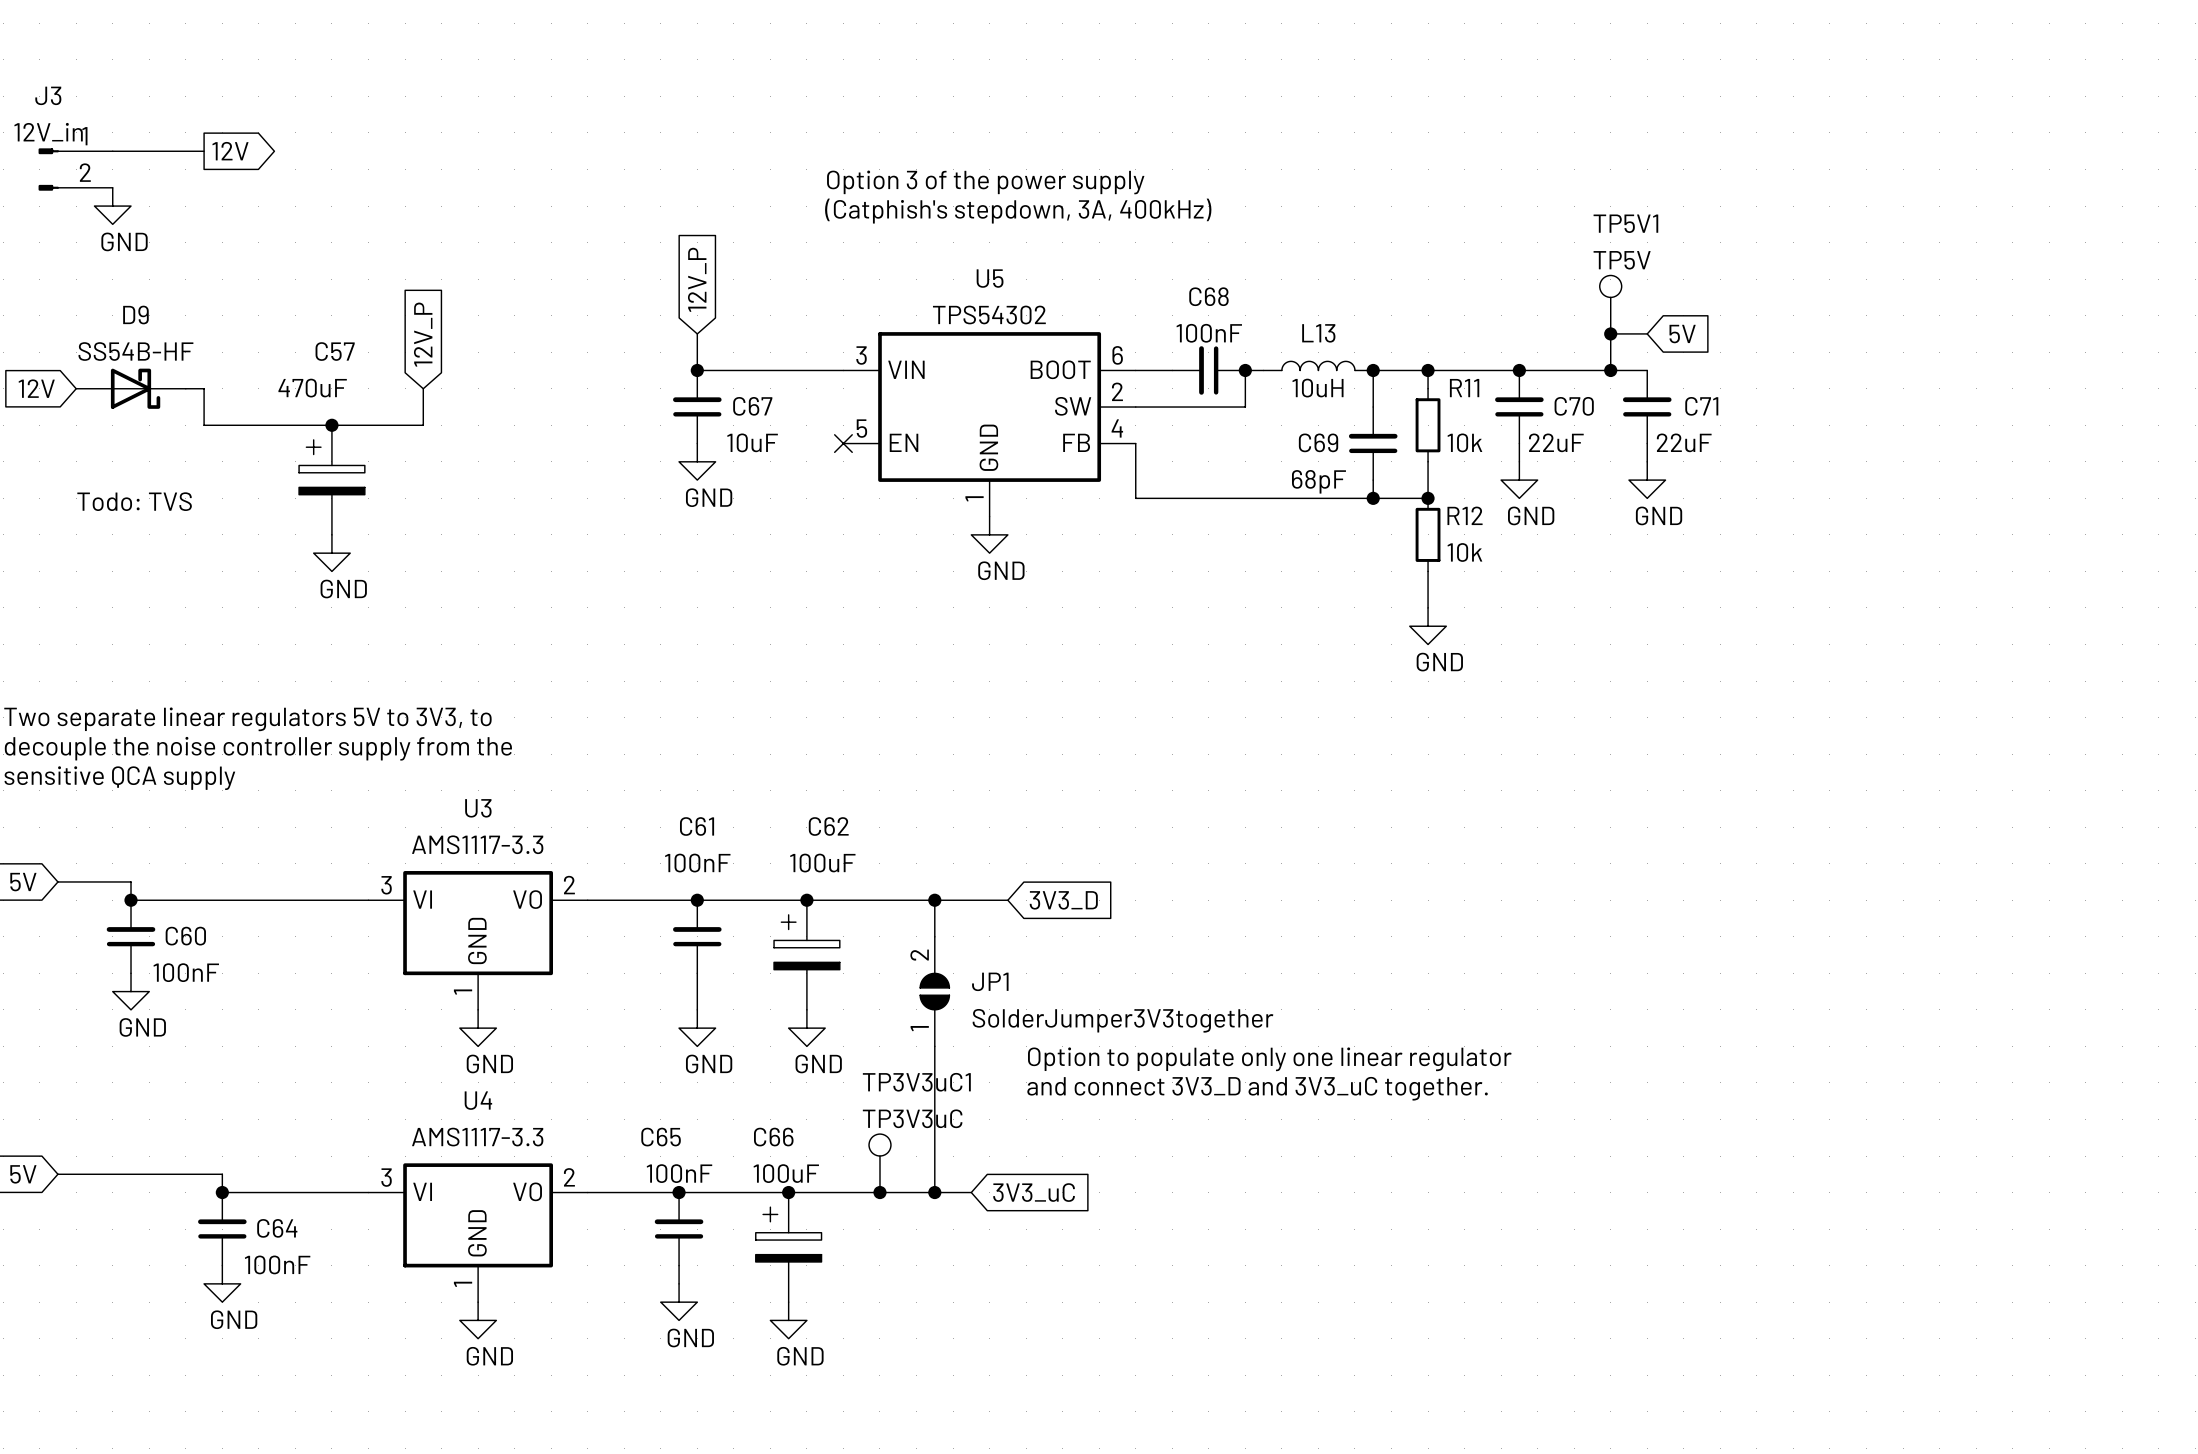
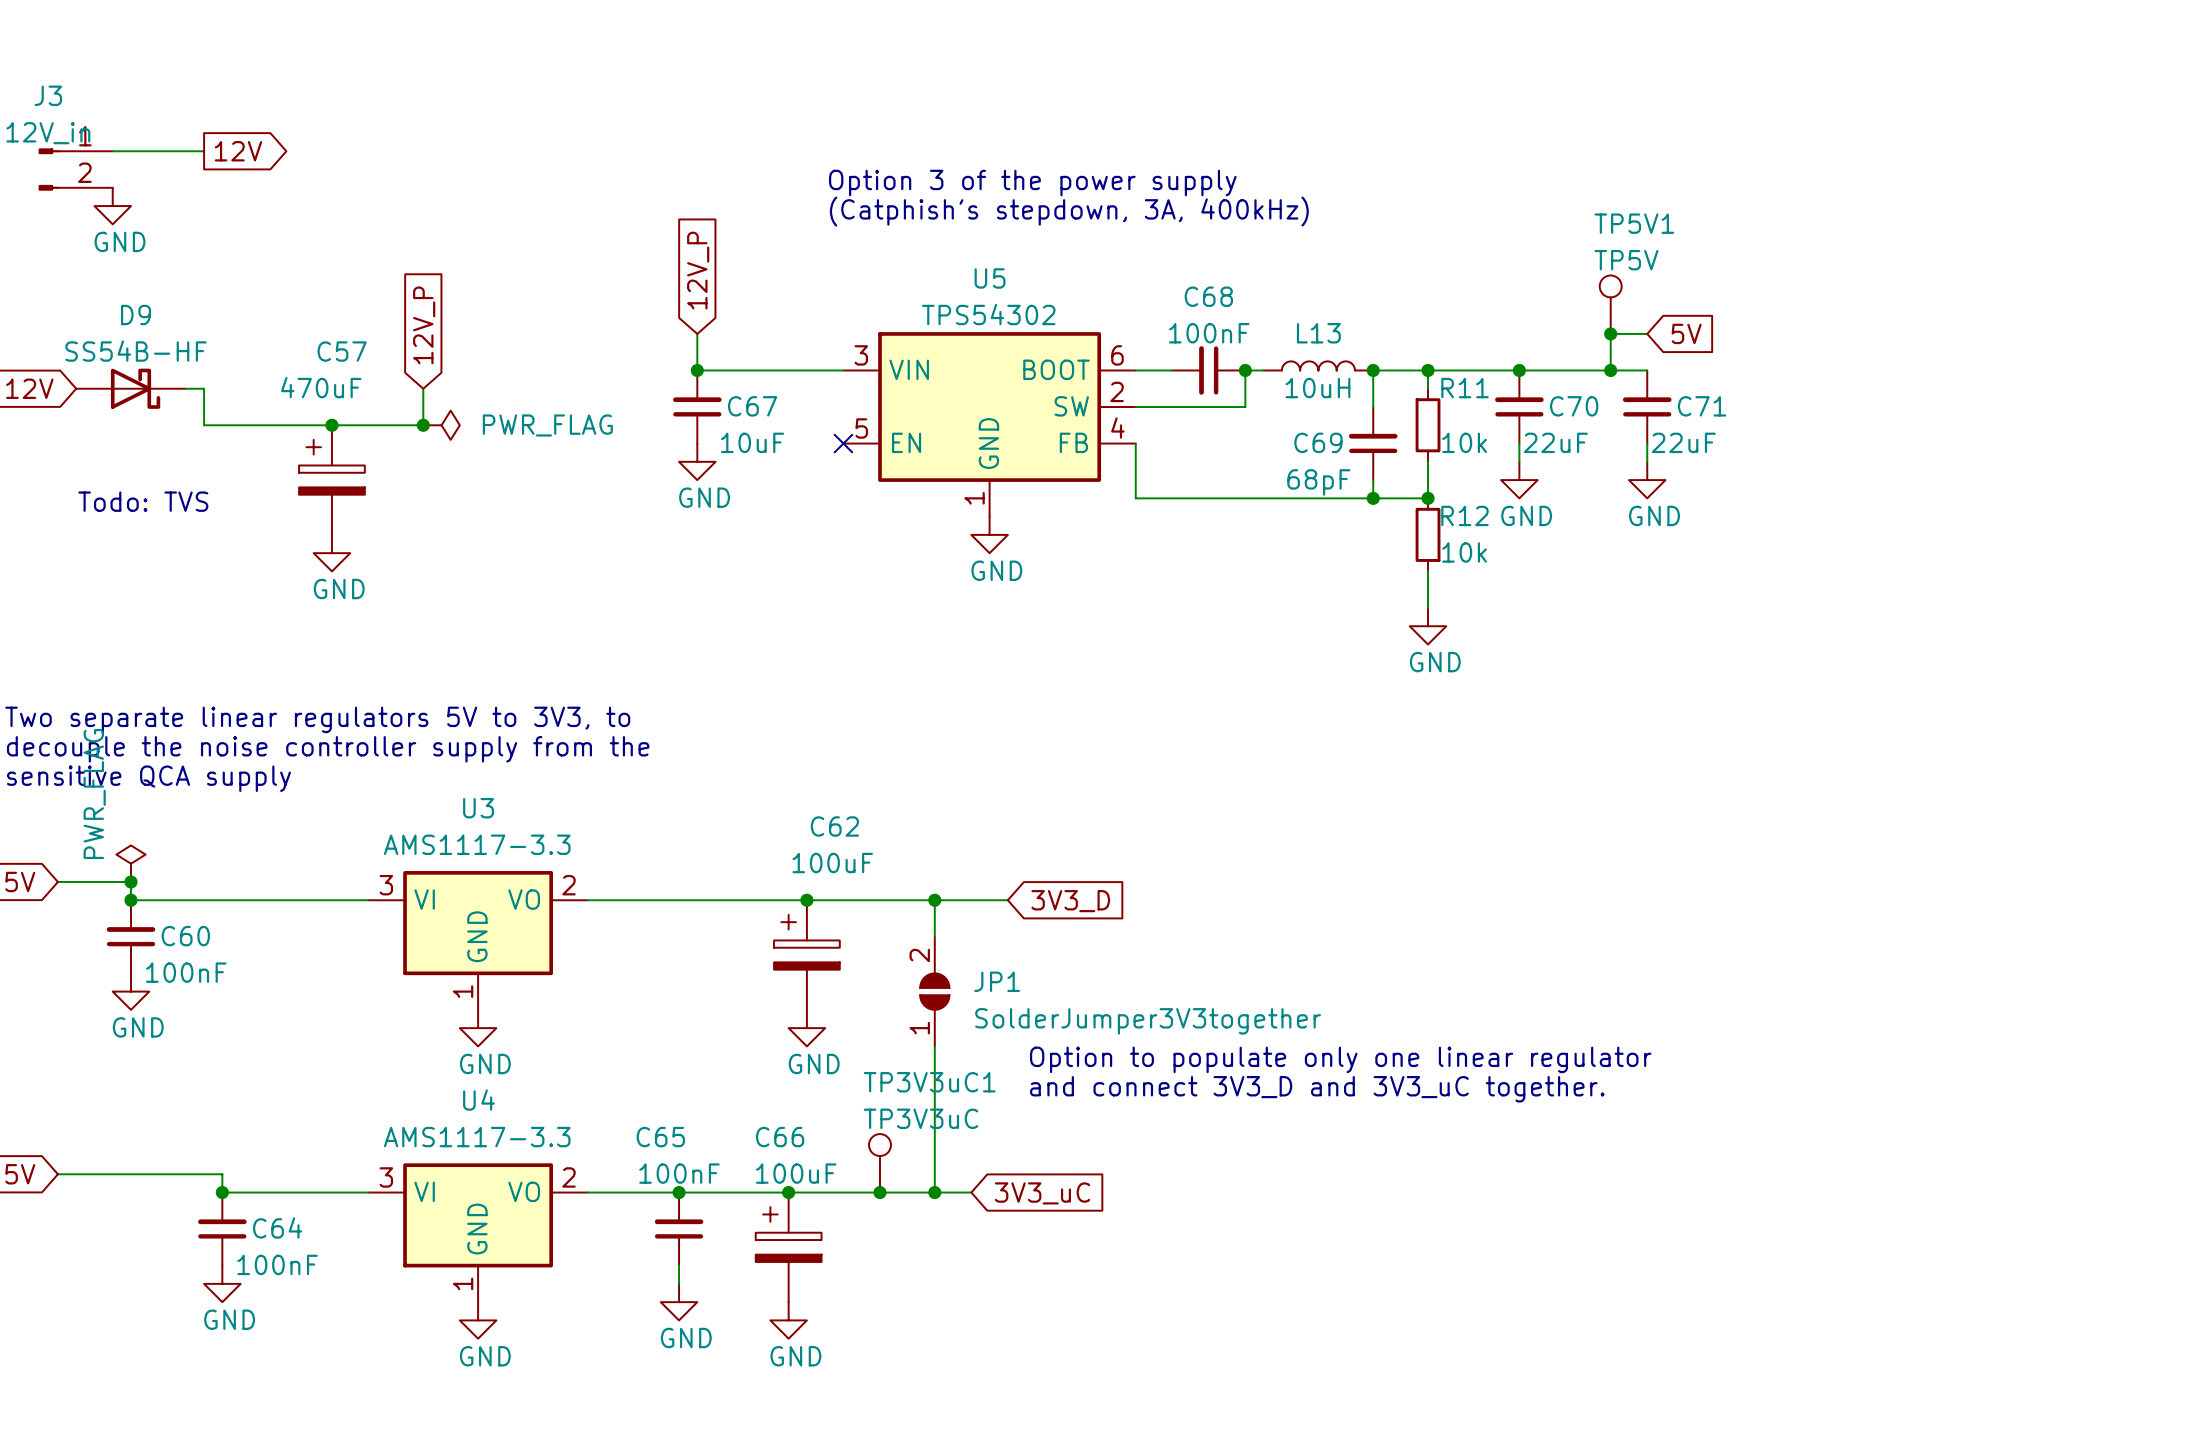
junction: none -> (423, 425)
power symbol: none -> PWR_FLAG (441, 425)
power symbol: none -> PWR_FLAG (131, 863)
junction: none -> (131, 881)
junction: (697, 900) -> none
C61: 100nF (697, 936) -> none
wire: (697, 973) (697, 1009) -> none
power symbol: GND (697, 1028) -> none

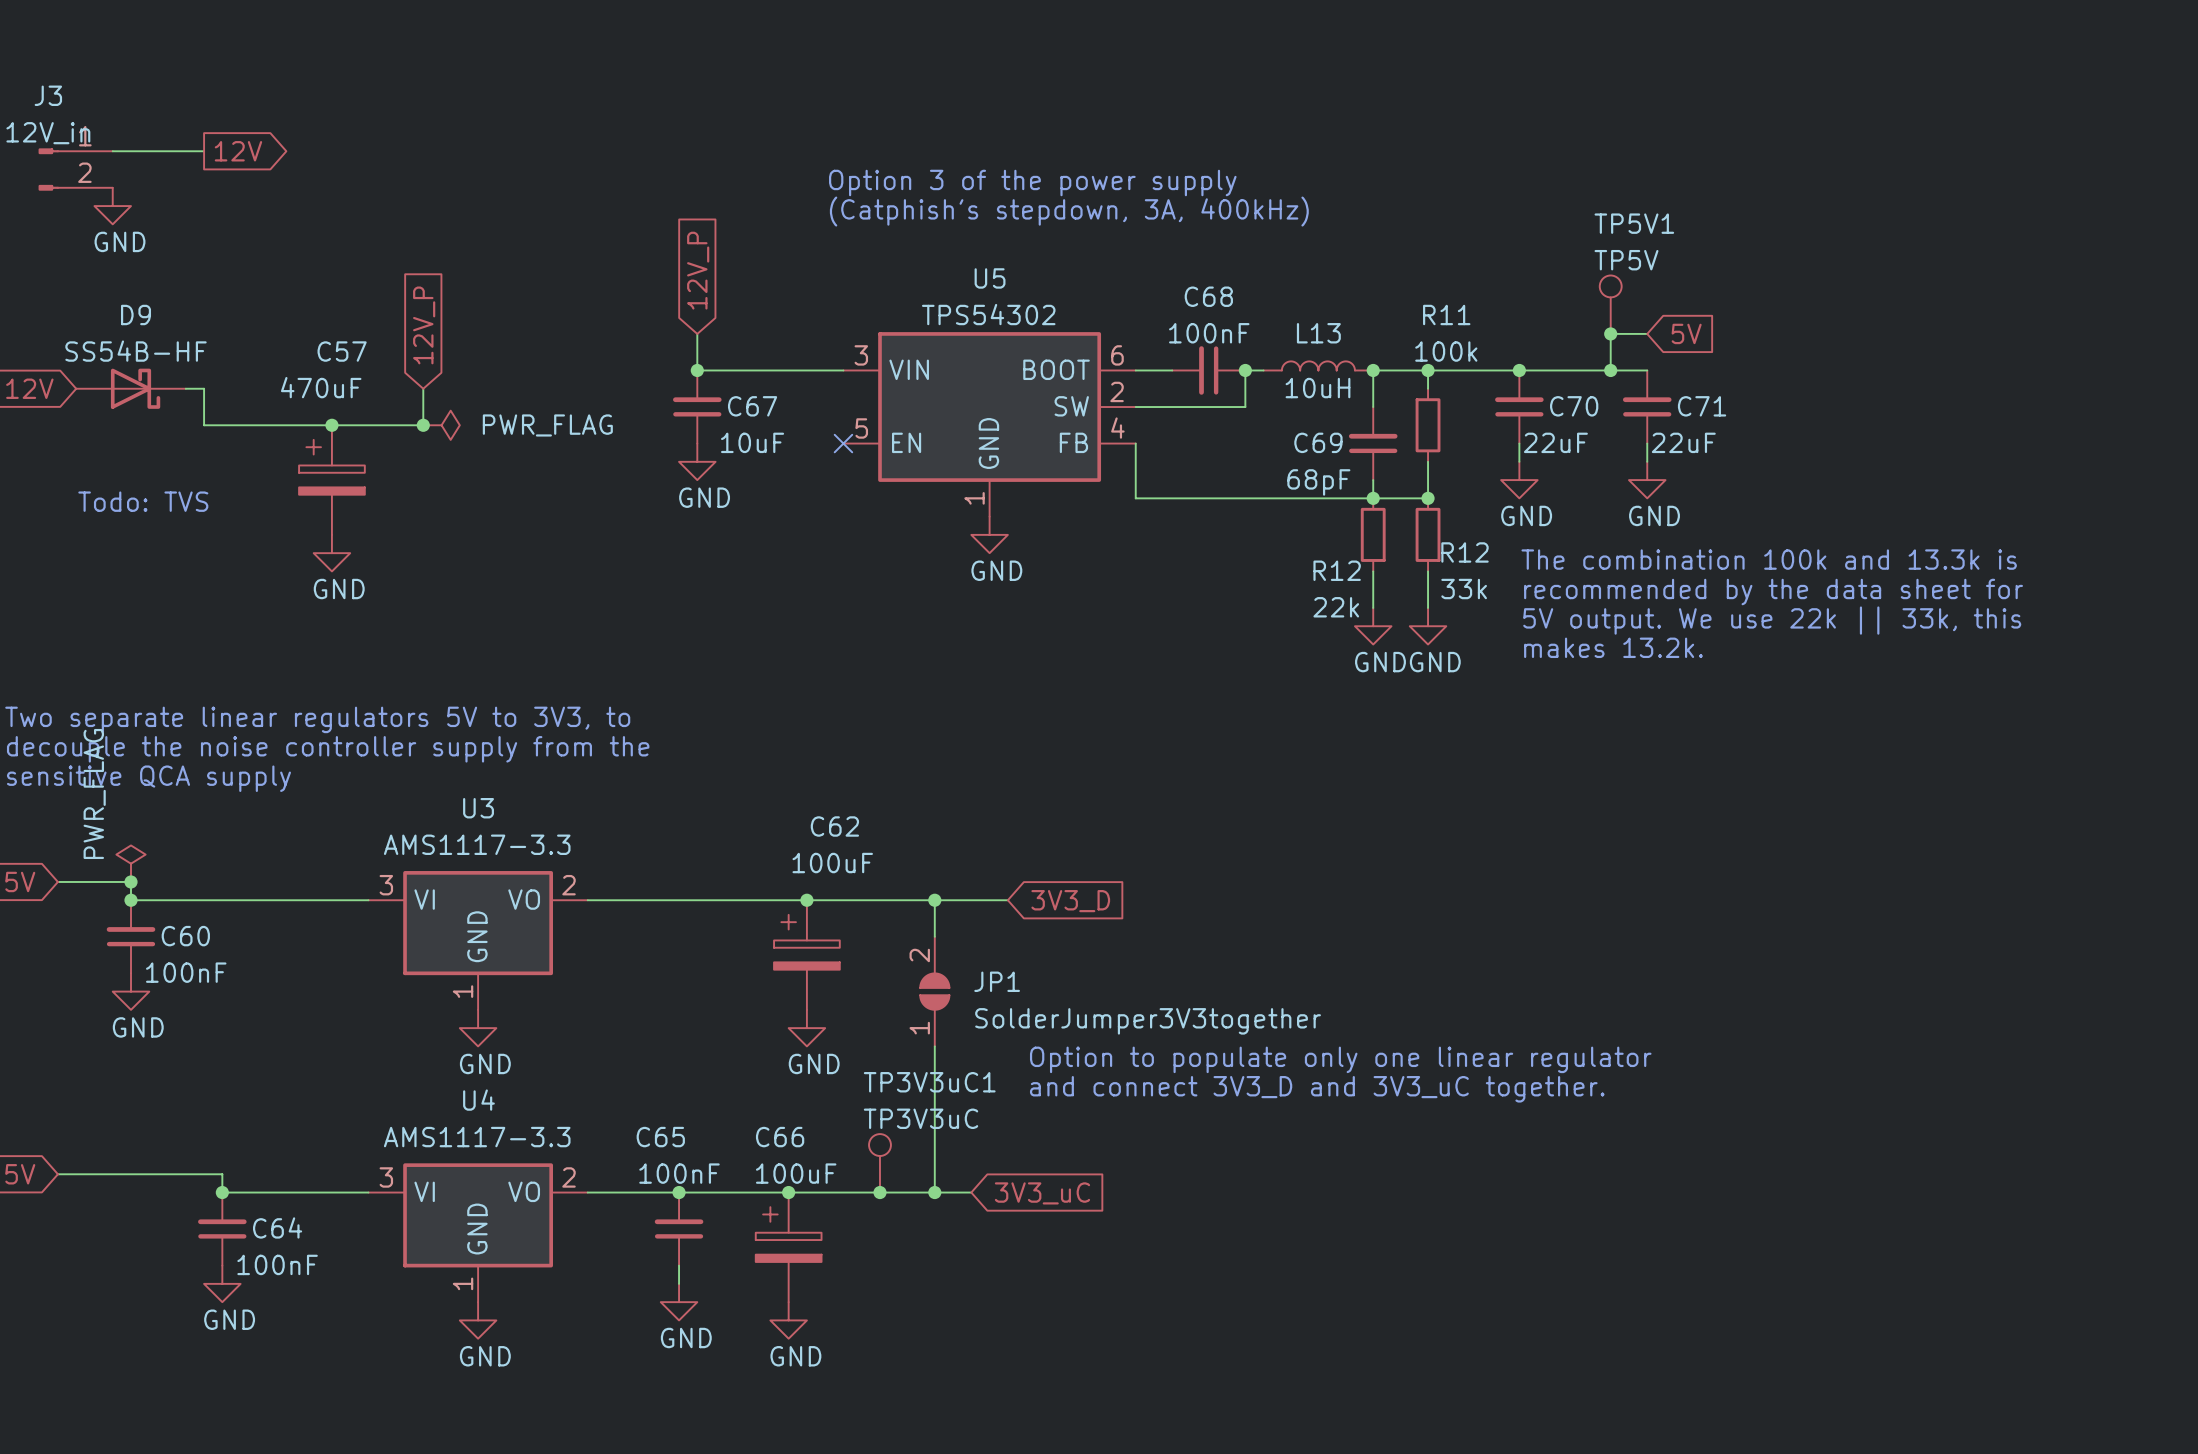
R11 name position: R11 (1465, 388) -> R11 (1446, 314)
R11 value: 10k (1464, 442) -> 100k (1446, 351)
R12 name position: R12 (1465, 515) -> R12 (1465, 552)
R12: none -> 22k (1373, 534)
R12 value: 10k (1464, 552) -> 33k (1464, 589)
text: none -> The combination 100k and 13.3k is (1769, 559)
wire: none -> (1373, 571) (1373, 607)
text: none -> recommended by the data sheet for (1773, 592)
text: none -> 5V output. We use 22k || 33k, this (1772, 620)
power symbol: none -> GND (1373, 626)
text: none -> makes 13.2k. (1613, 647)

